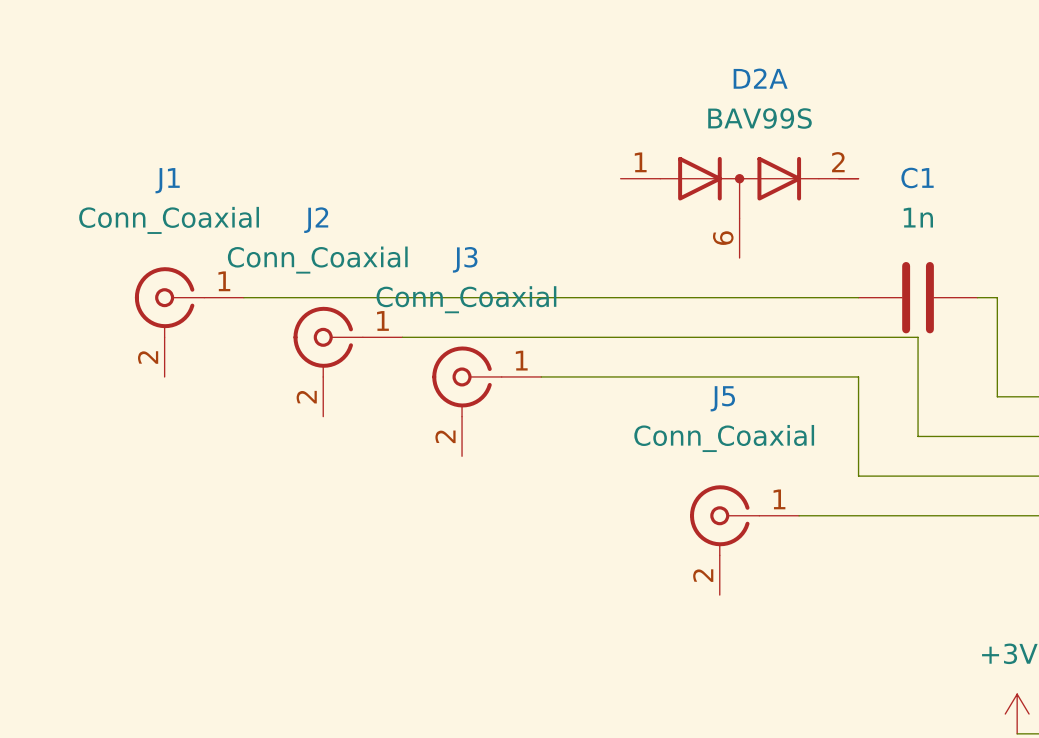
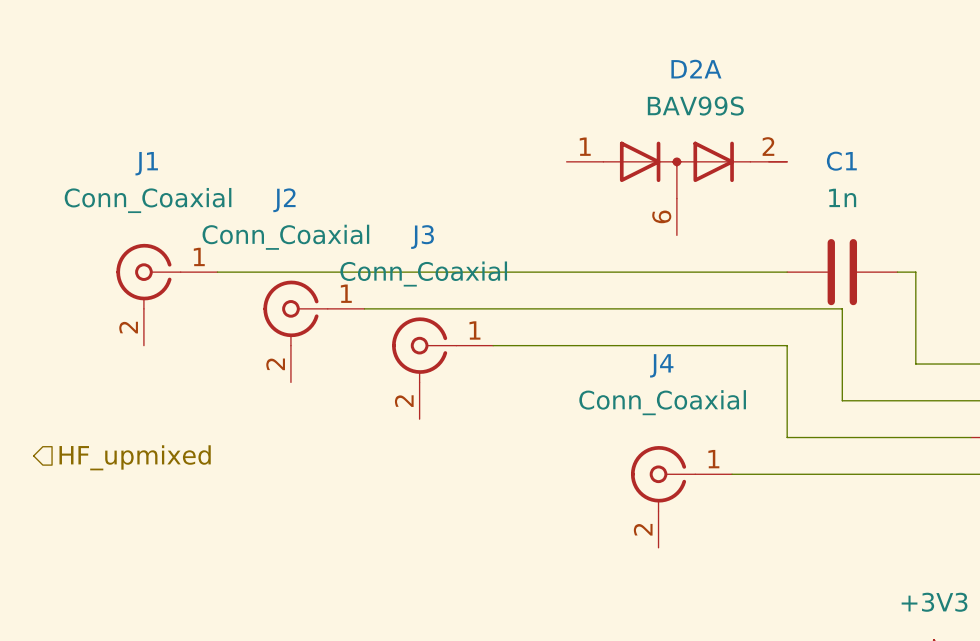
J5 name: J5 (722, 398) -> J4 (661, 365)
hierarchical label: none -> HF_upmixed (135, 457)

